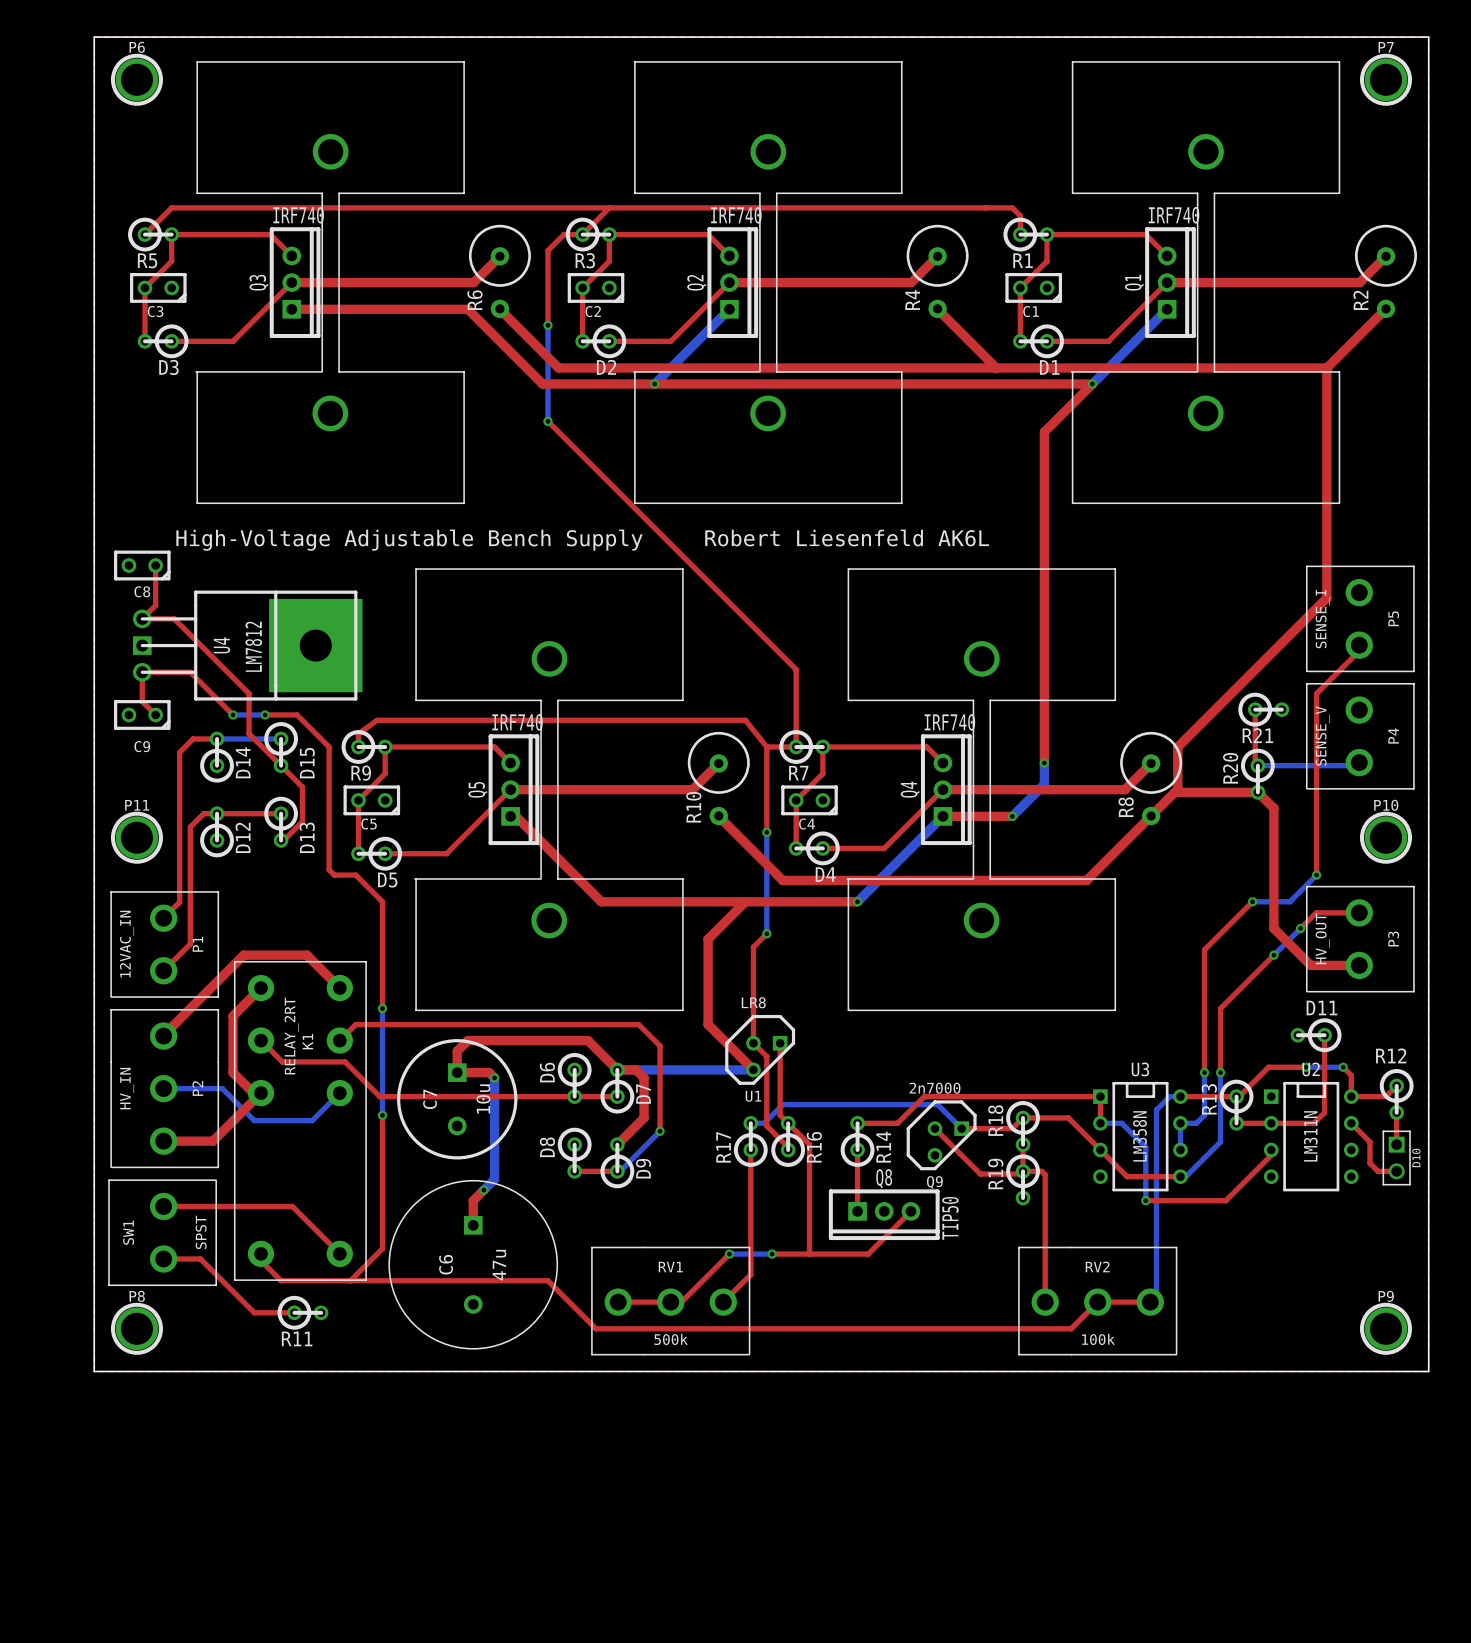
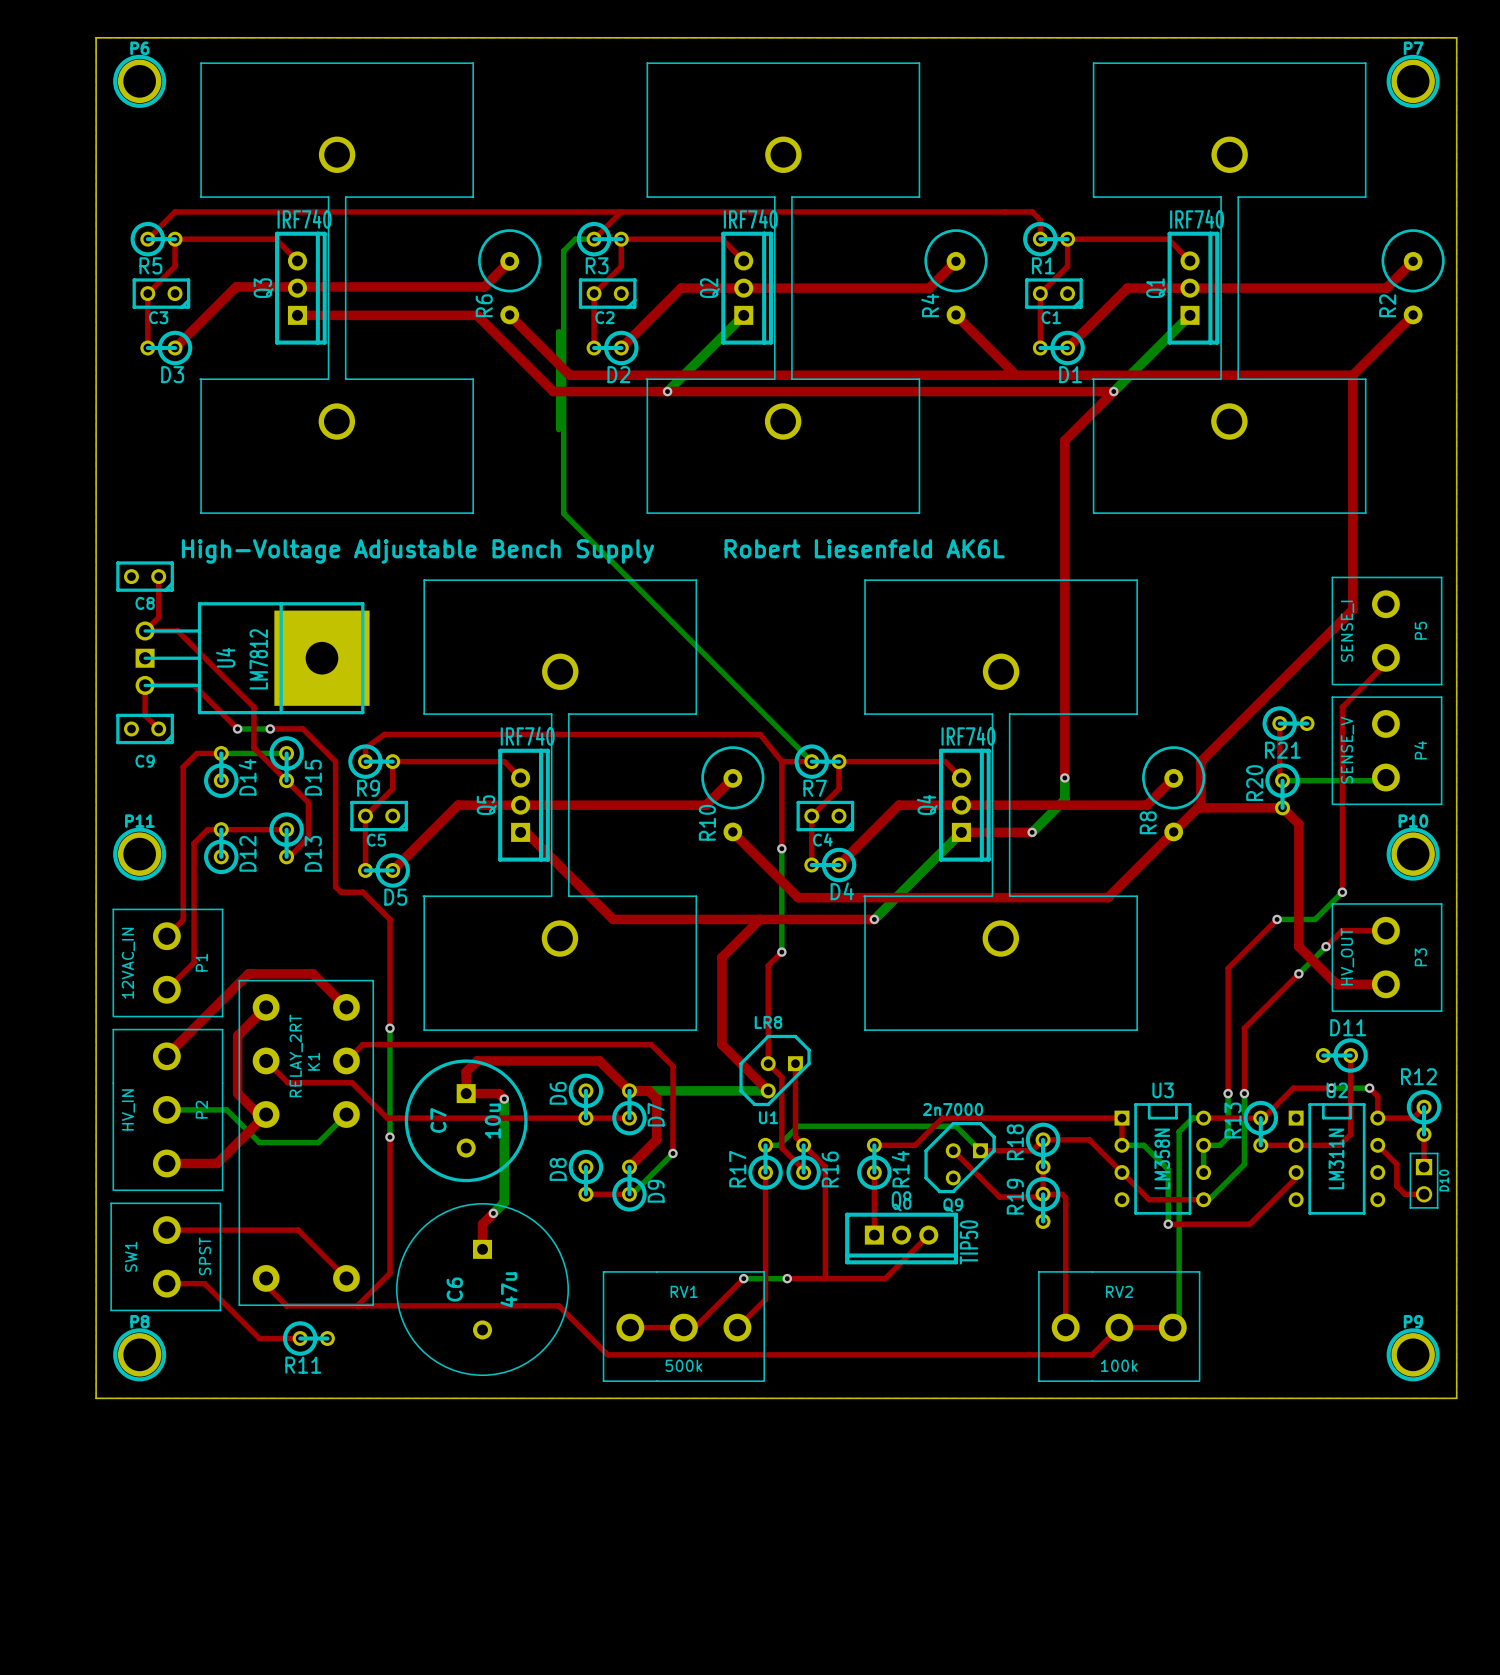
top track: (582, 234) (563, 234) (547, 250) (547, 325) -> none
bottom track: none -> (594, 239) (575, 239) (563, 251) (563, 513) (811, 761)
top track: (474, 281) (291, 282) (233, 341) (171, 341) -> (484, 286) (236, 286) (175, 348)
top track: (729, 282) (670, 341) (609, 341) -> (743, 288) (681, 288) (621, 348)
top track: (1167, 282) (1108, 341) (1047, 341) -> (1190, 288) (1127, 288) (1067, 348)
via: (547, 325) -> none
top track: (547, 421) (796, 669) (796, 746) -> none
via: (547, 421) -> none
top track: (510, 789) (446, 853) (385, 853) -> (520, 805) (458, 805) (392, 870)
top track: (942, 789) (884, 848) (822, 848) -> (961, 805) (898, 805) (838, 865)

